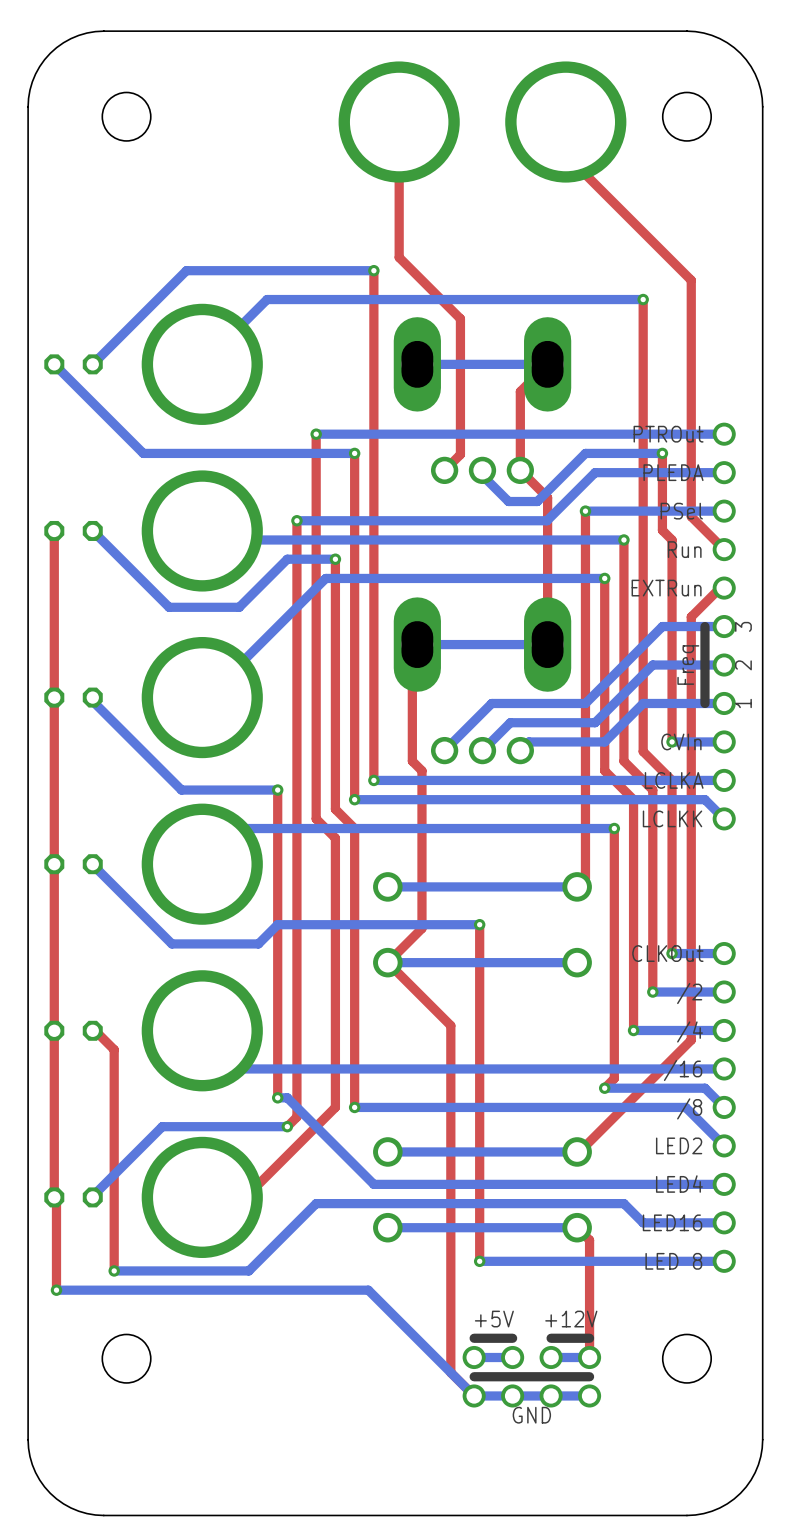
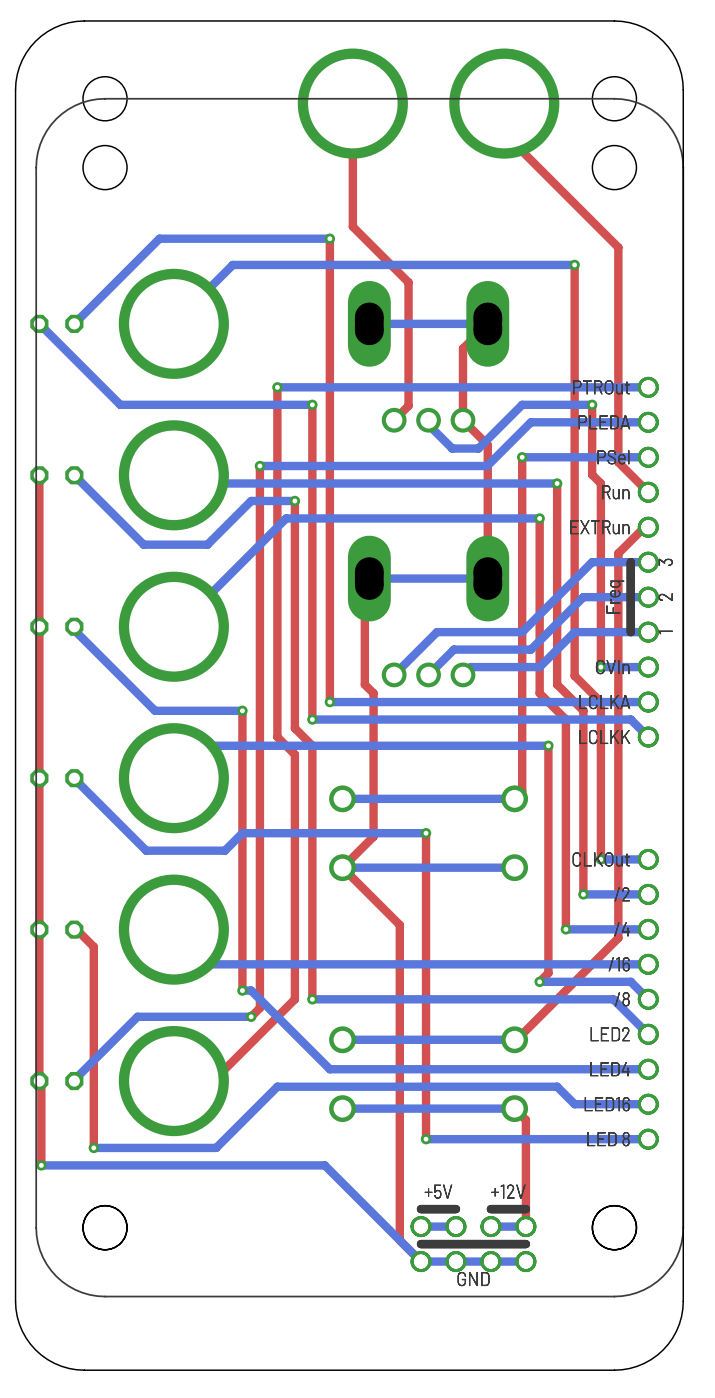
part: none -> (359, 697)

